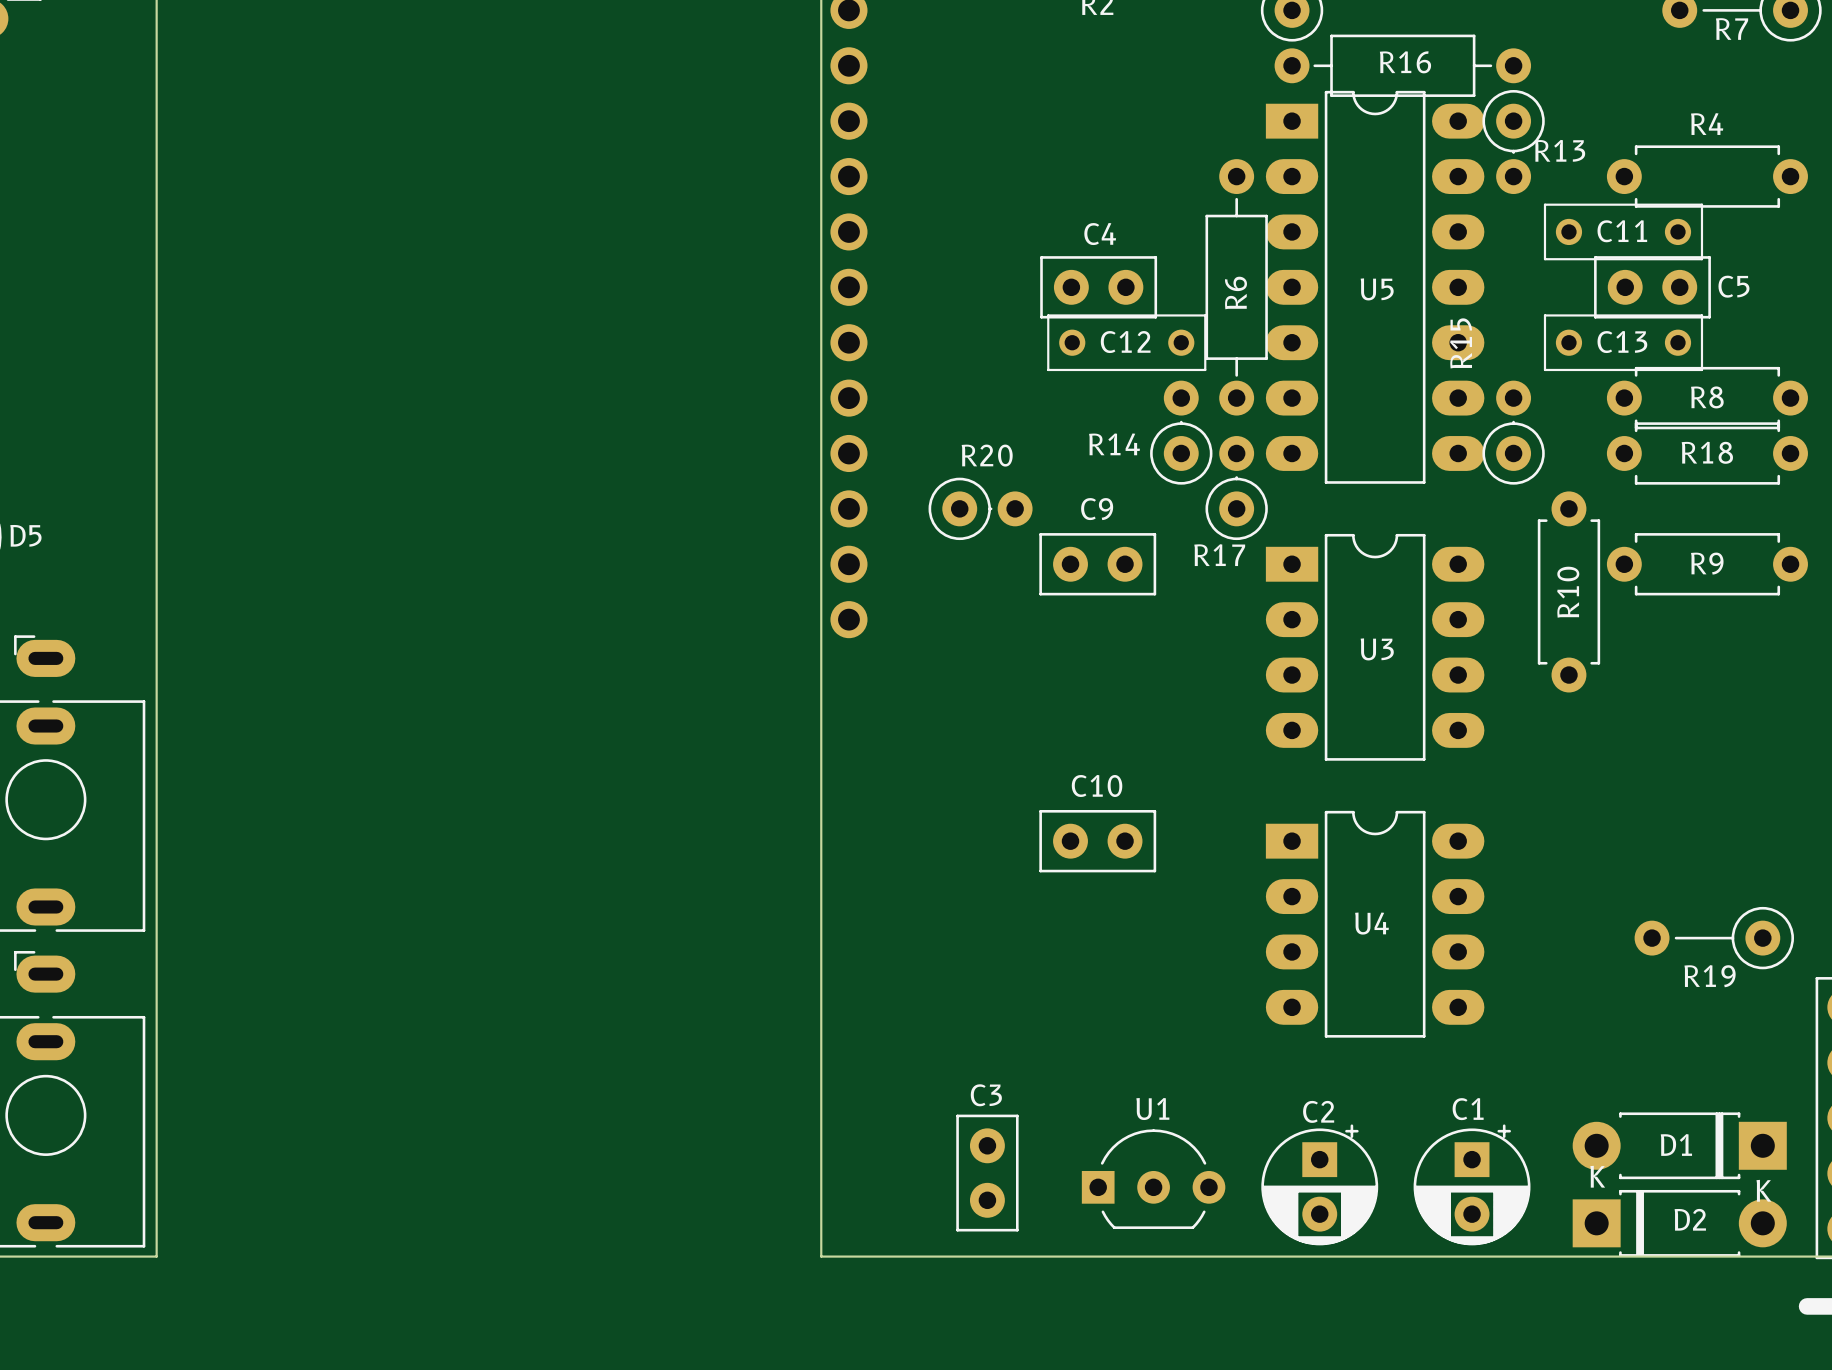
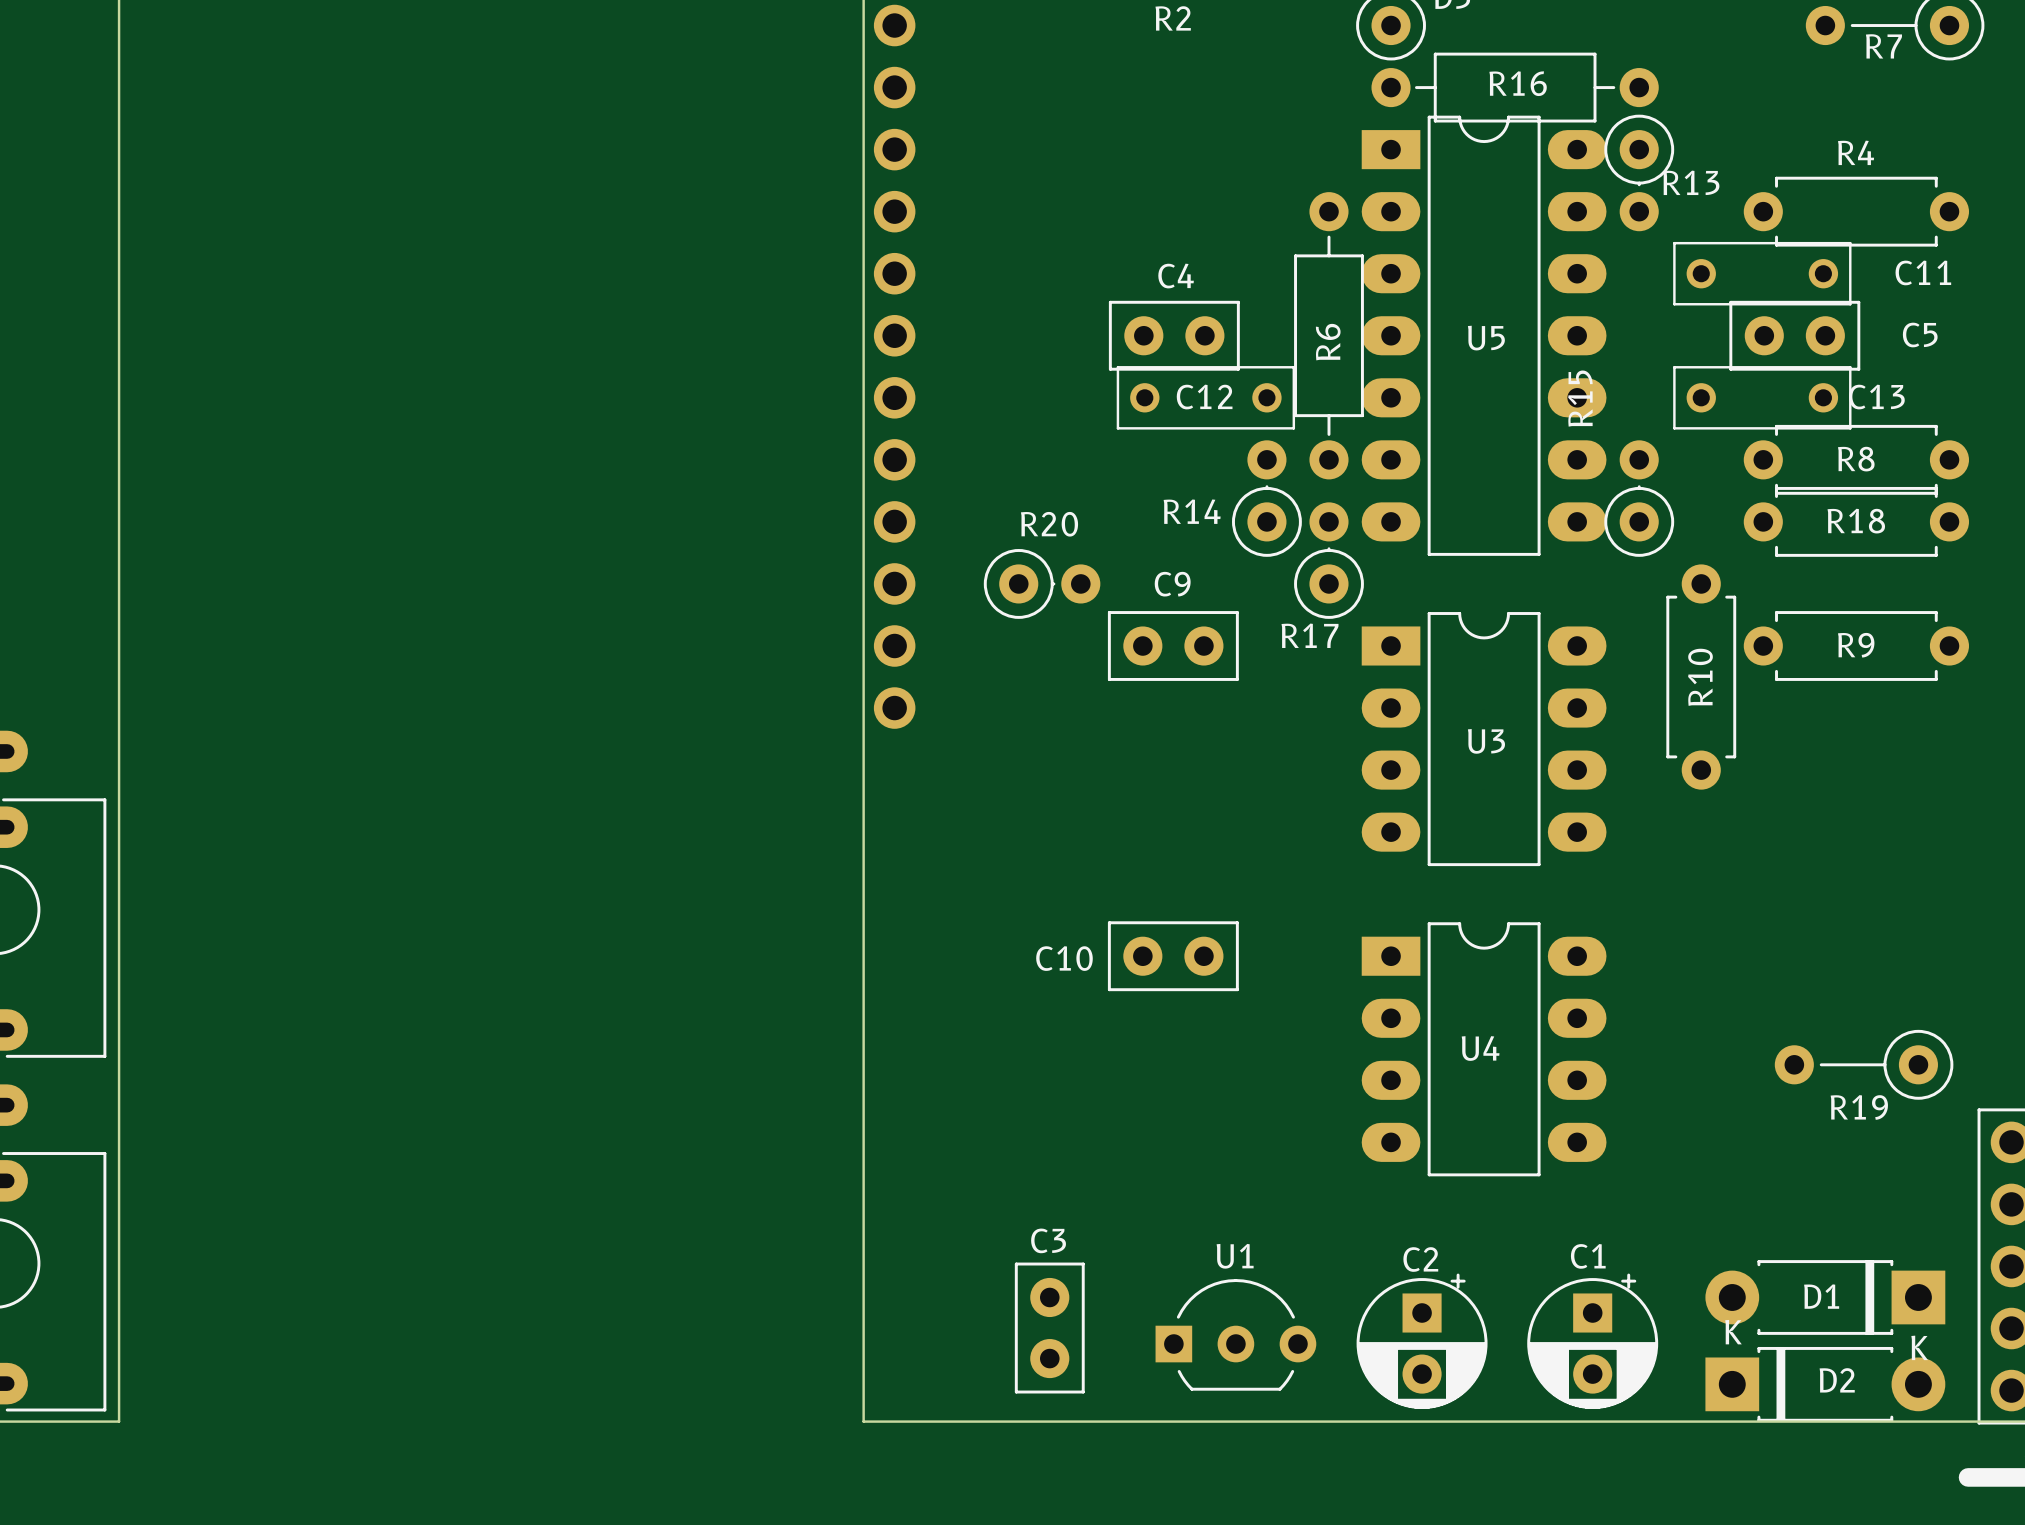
C11 name position: C11 (1622, 231) -> C11 (1923, 272)
C5 name position: C5 (1733, 286) -> C5 (1920, 335)
C13 name position: C13 (1622, 342) -> C13 (1876, 397)
C10 name position: C10 (1097, 785) -> C10 (1064, 958)

